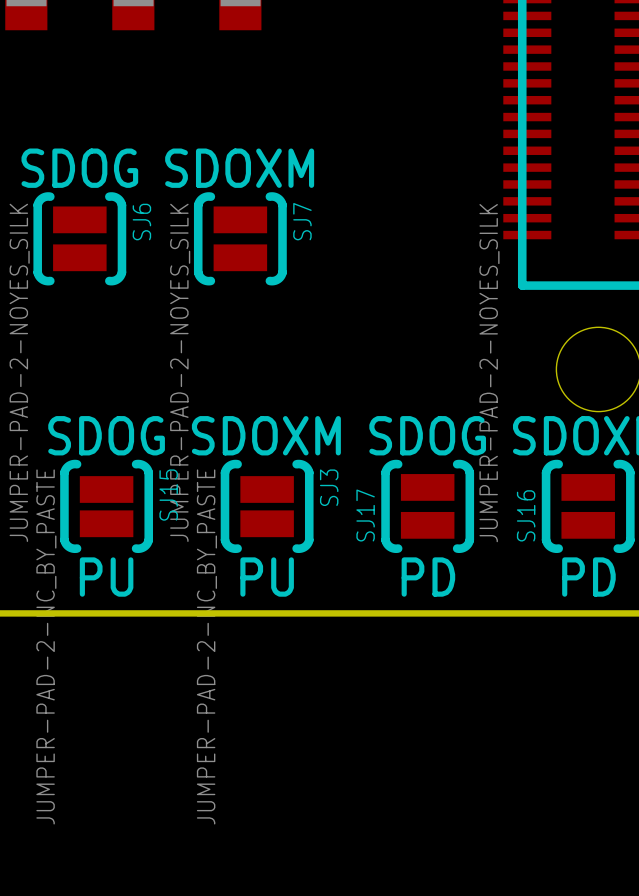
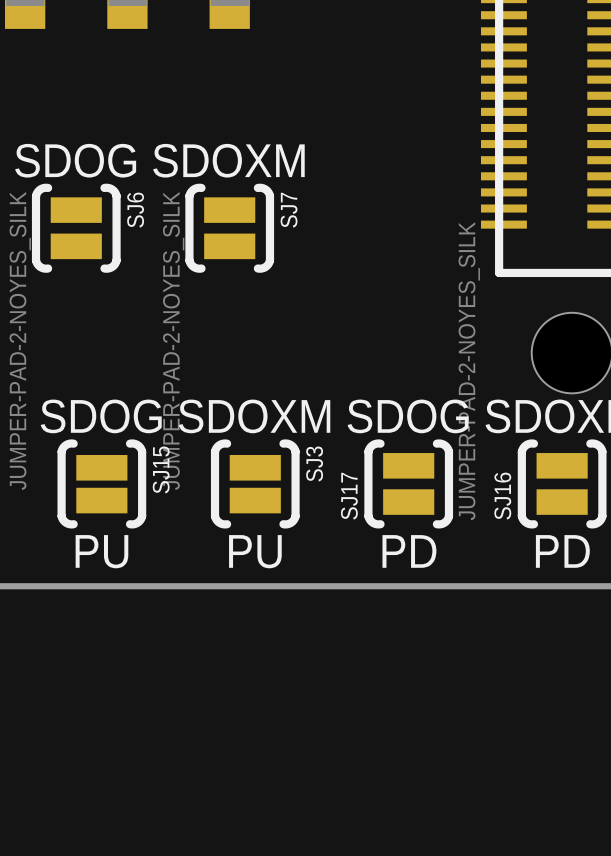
SJ15 value: JUMPER-PAD-2-NC_BY_PASTE (46, 646) -> none
SJ3 value: JUMPER-PAD-2-NC_BY_PASTE (206, 646) -> none

